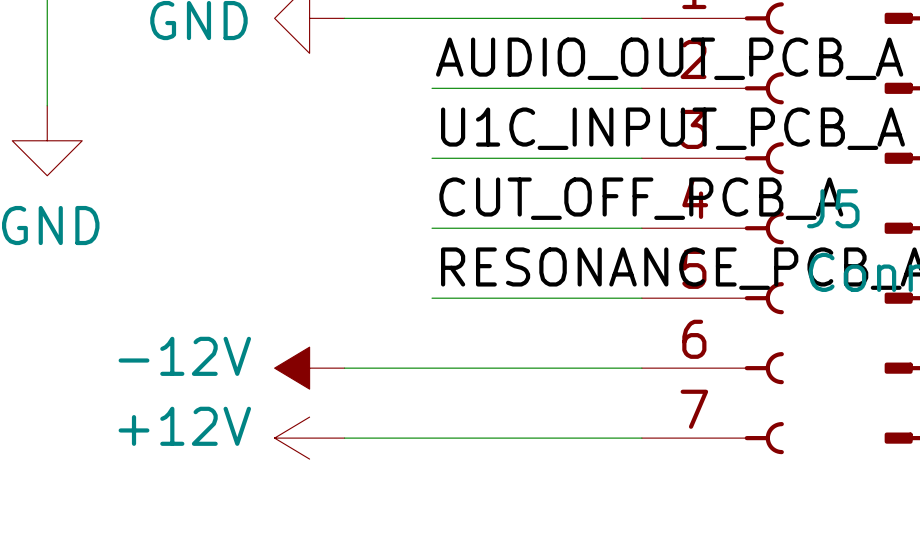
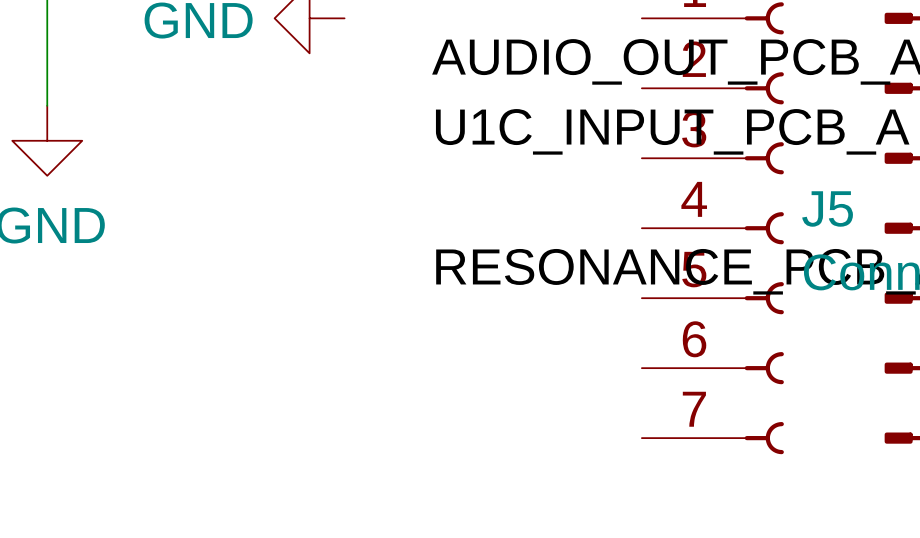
wire: (344, 18) (641, 18) -> none
wire: (432, 88) (641, 88) -> none
wire: (432, 158) (641, 158) -> none
label: CUT_OFF_PCB_A (641, 198) -> none
wire: (432, 228) (641, 228) -> none
wire: (432, 298) (641, 298) -> none
power symbol: -12V (309, 368) -> none
wire: (344, 368) (641, 368) -> none
power symbol: +12V (309, 438) -> none
wire: (344, 438) (641, 438) -> none

